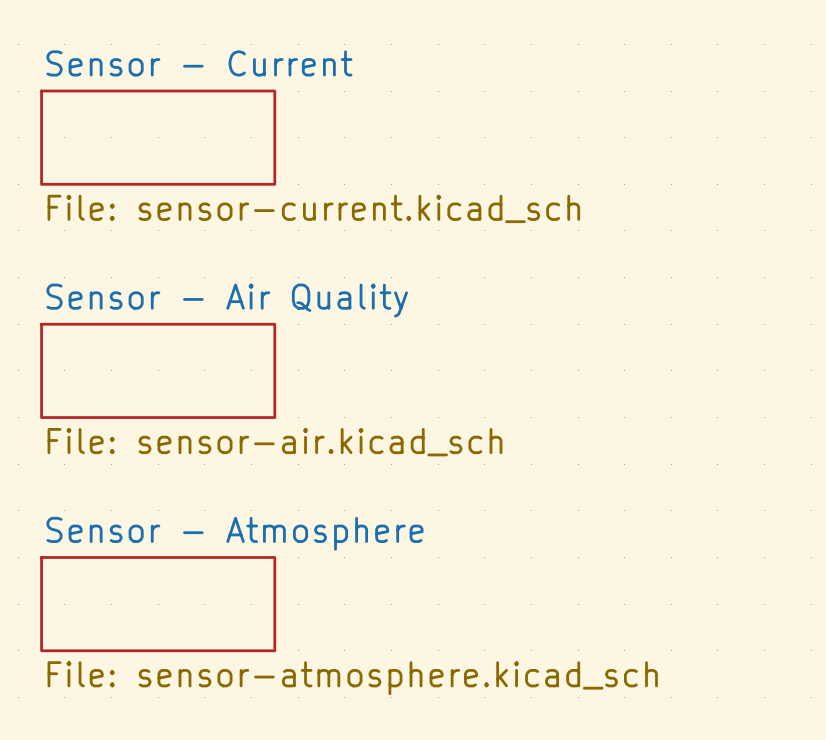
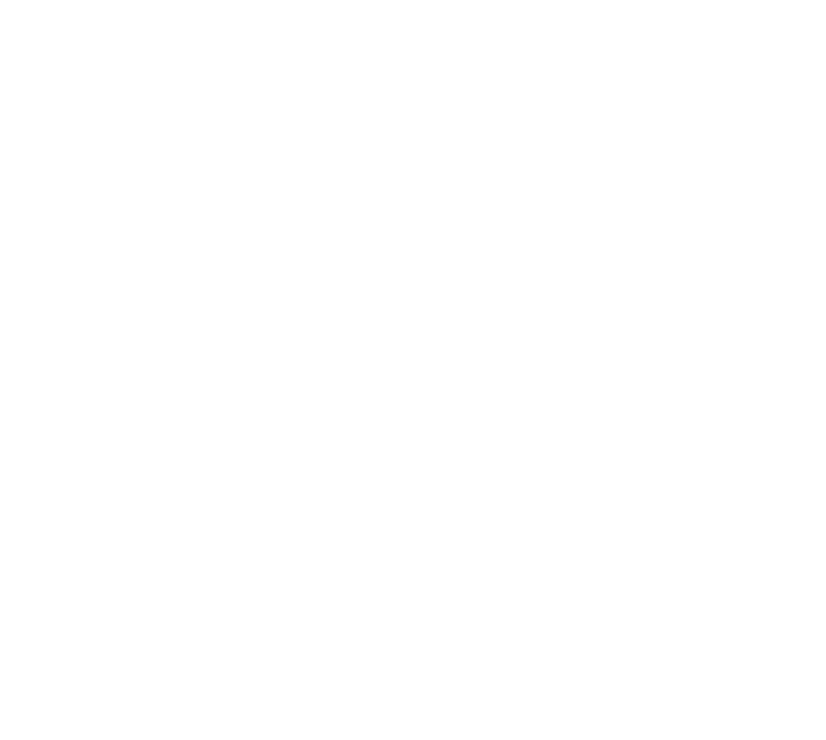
sheet Sensor - Current: File: sensor-current.kicad_sch (158, 137) -> none
sheet Sensor - Air Quality: File: sensor-air.kicad_sch (158, 370) -> none
sheet Sensor - Atmosphere: File: sensor-atmosphere.kicad_sch (158, 604) -> none

